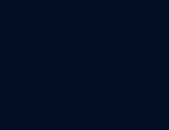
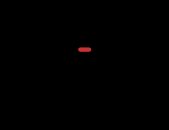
top track: none -> (80, 49) (89, 49)

